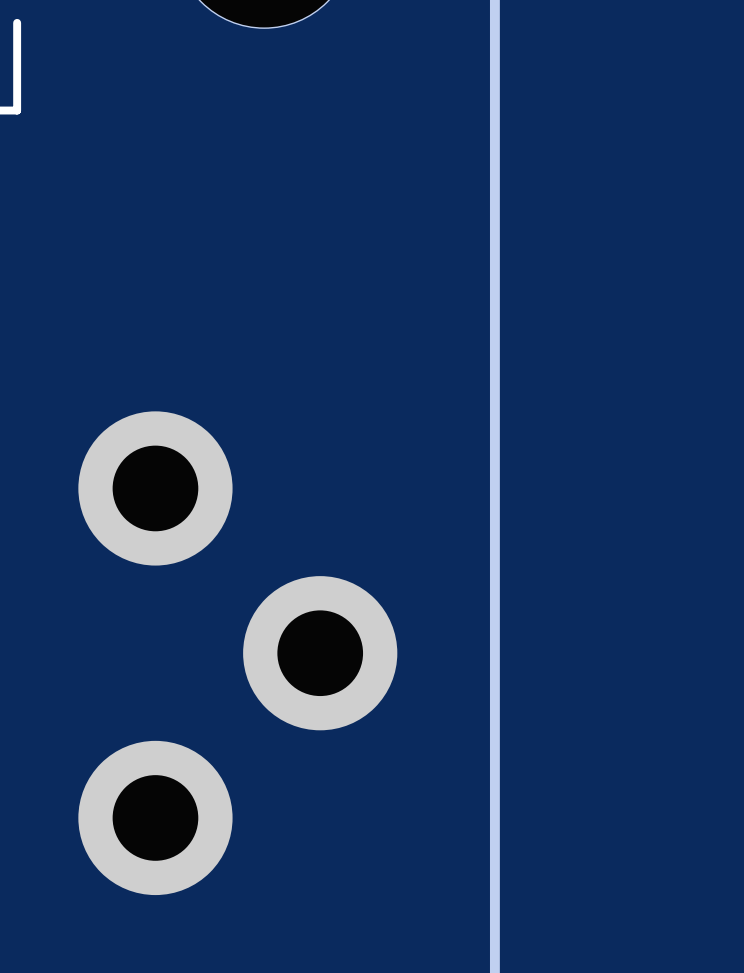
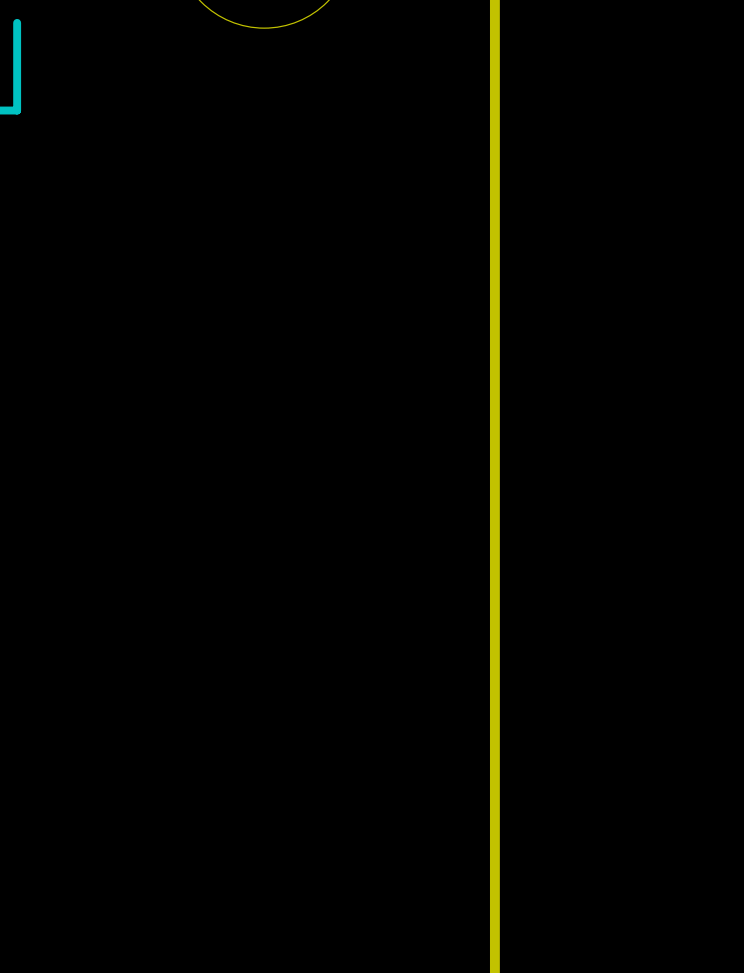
part: (237, 653) -> none

